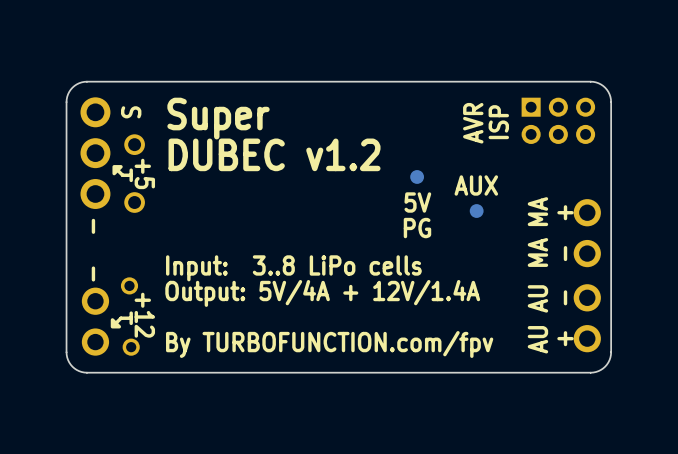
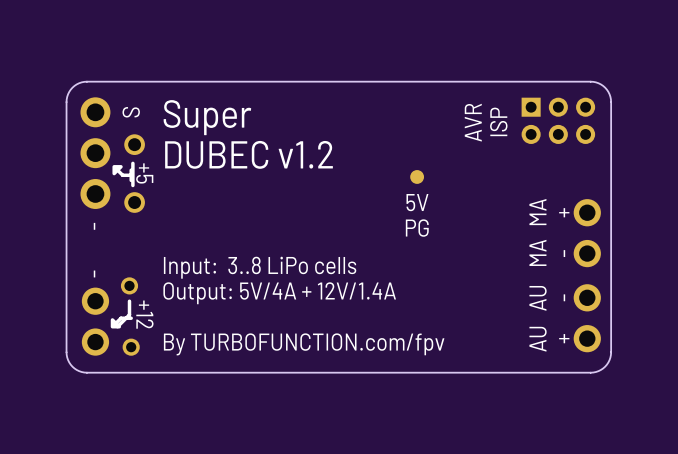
line: none -> (132, 163) (132, 185)
text: AUX (476, 185) -> none
part: (476, 211) -> none
line: none -> (129, 301) (129, 314) (117, 326)
line: (131, 313) (131, 323) -> none

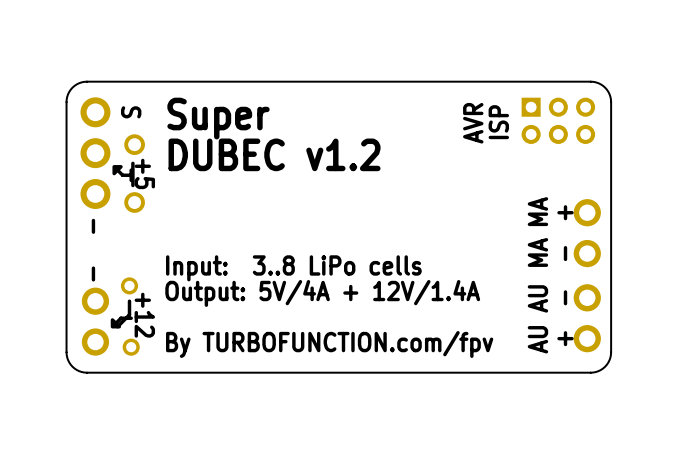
part: (417, 176) -> none
text: 5V (417, 202) -> none
text: PG (417, 228) -> none

